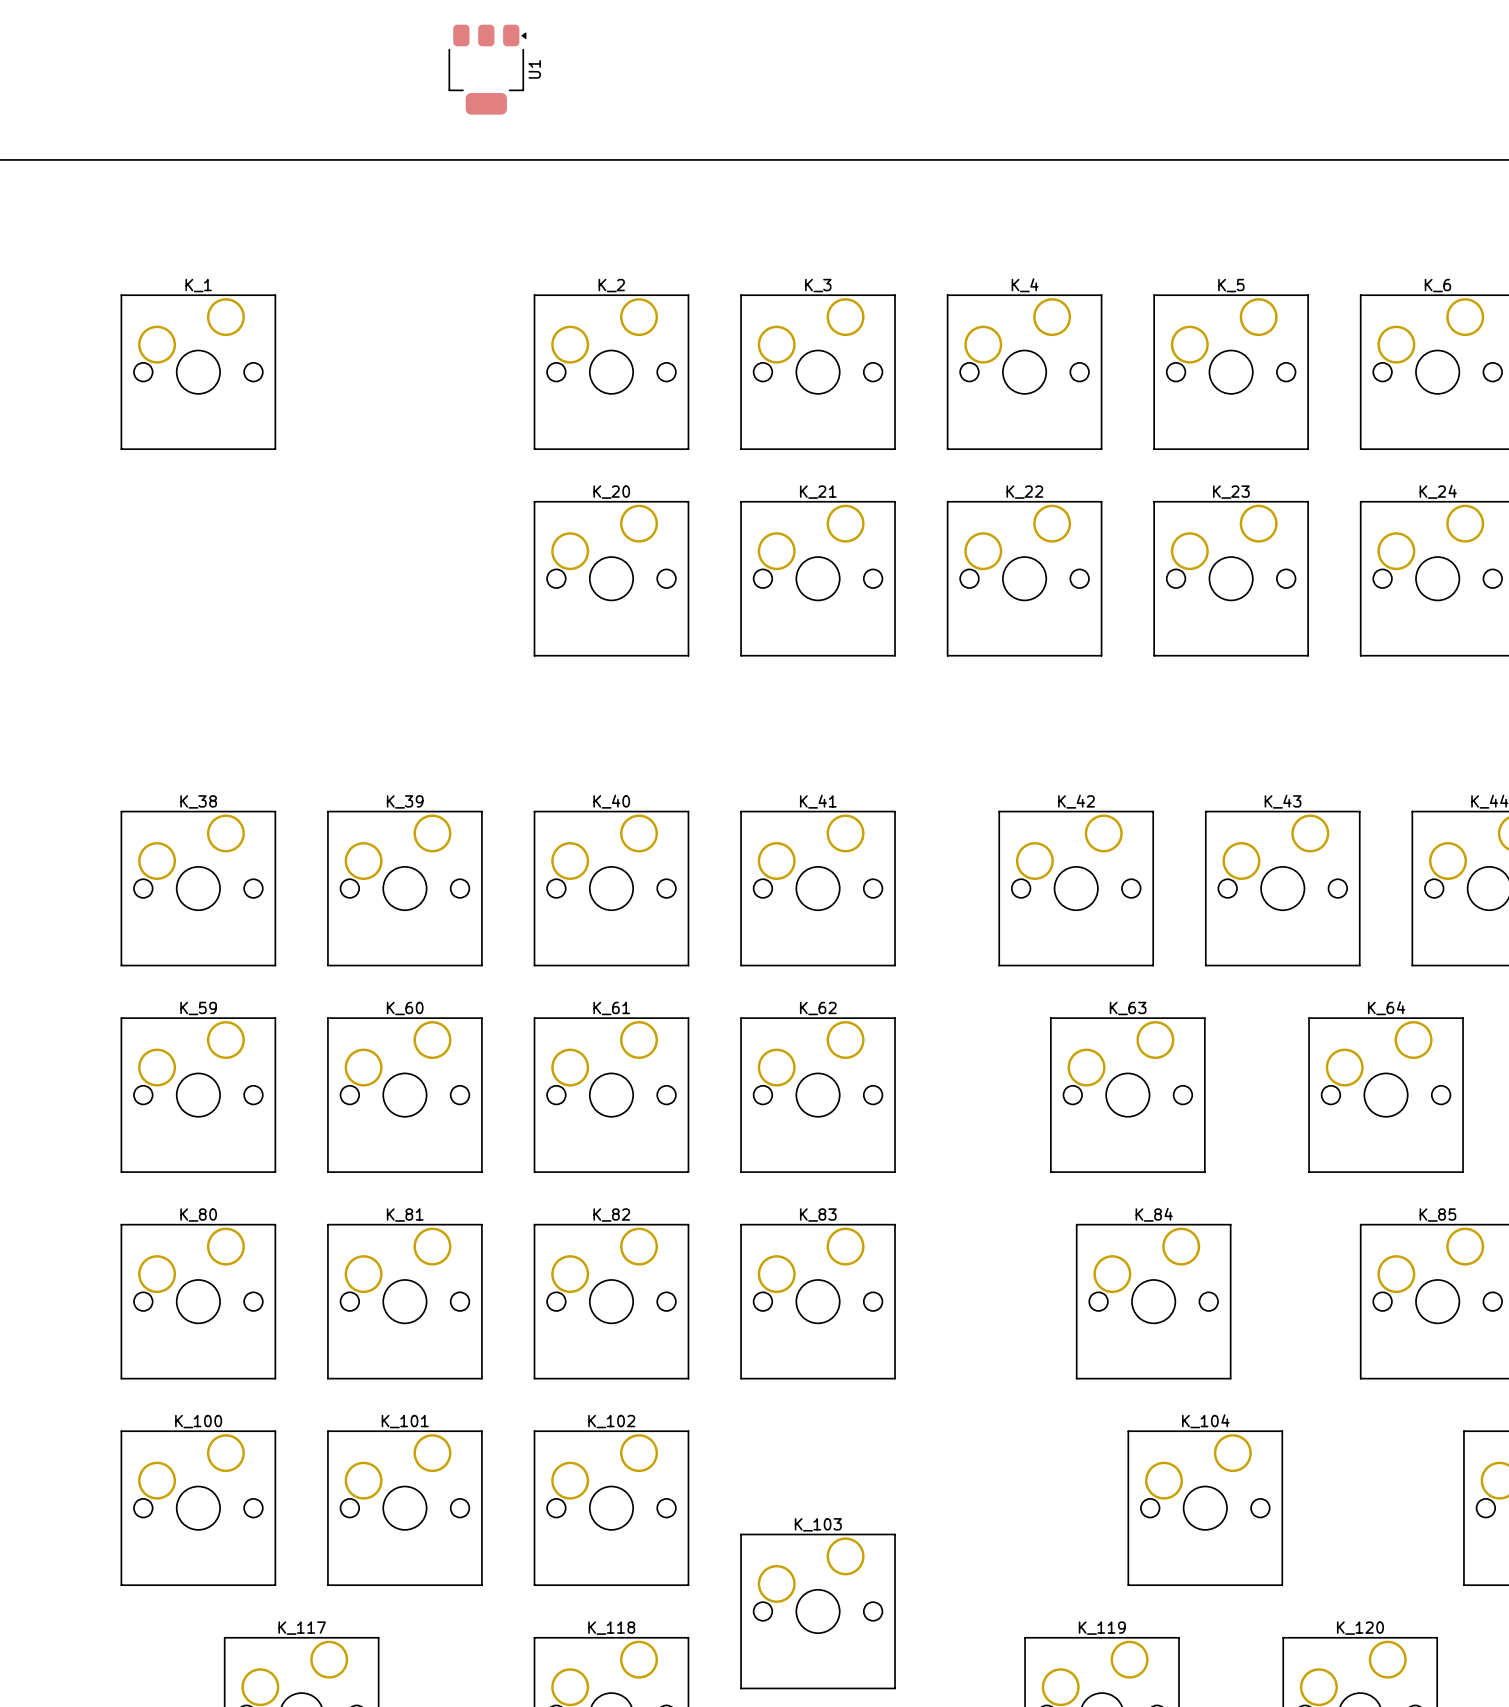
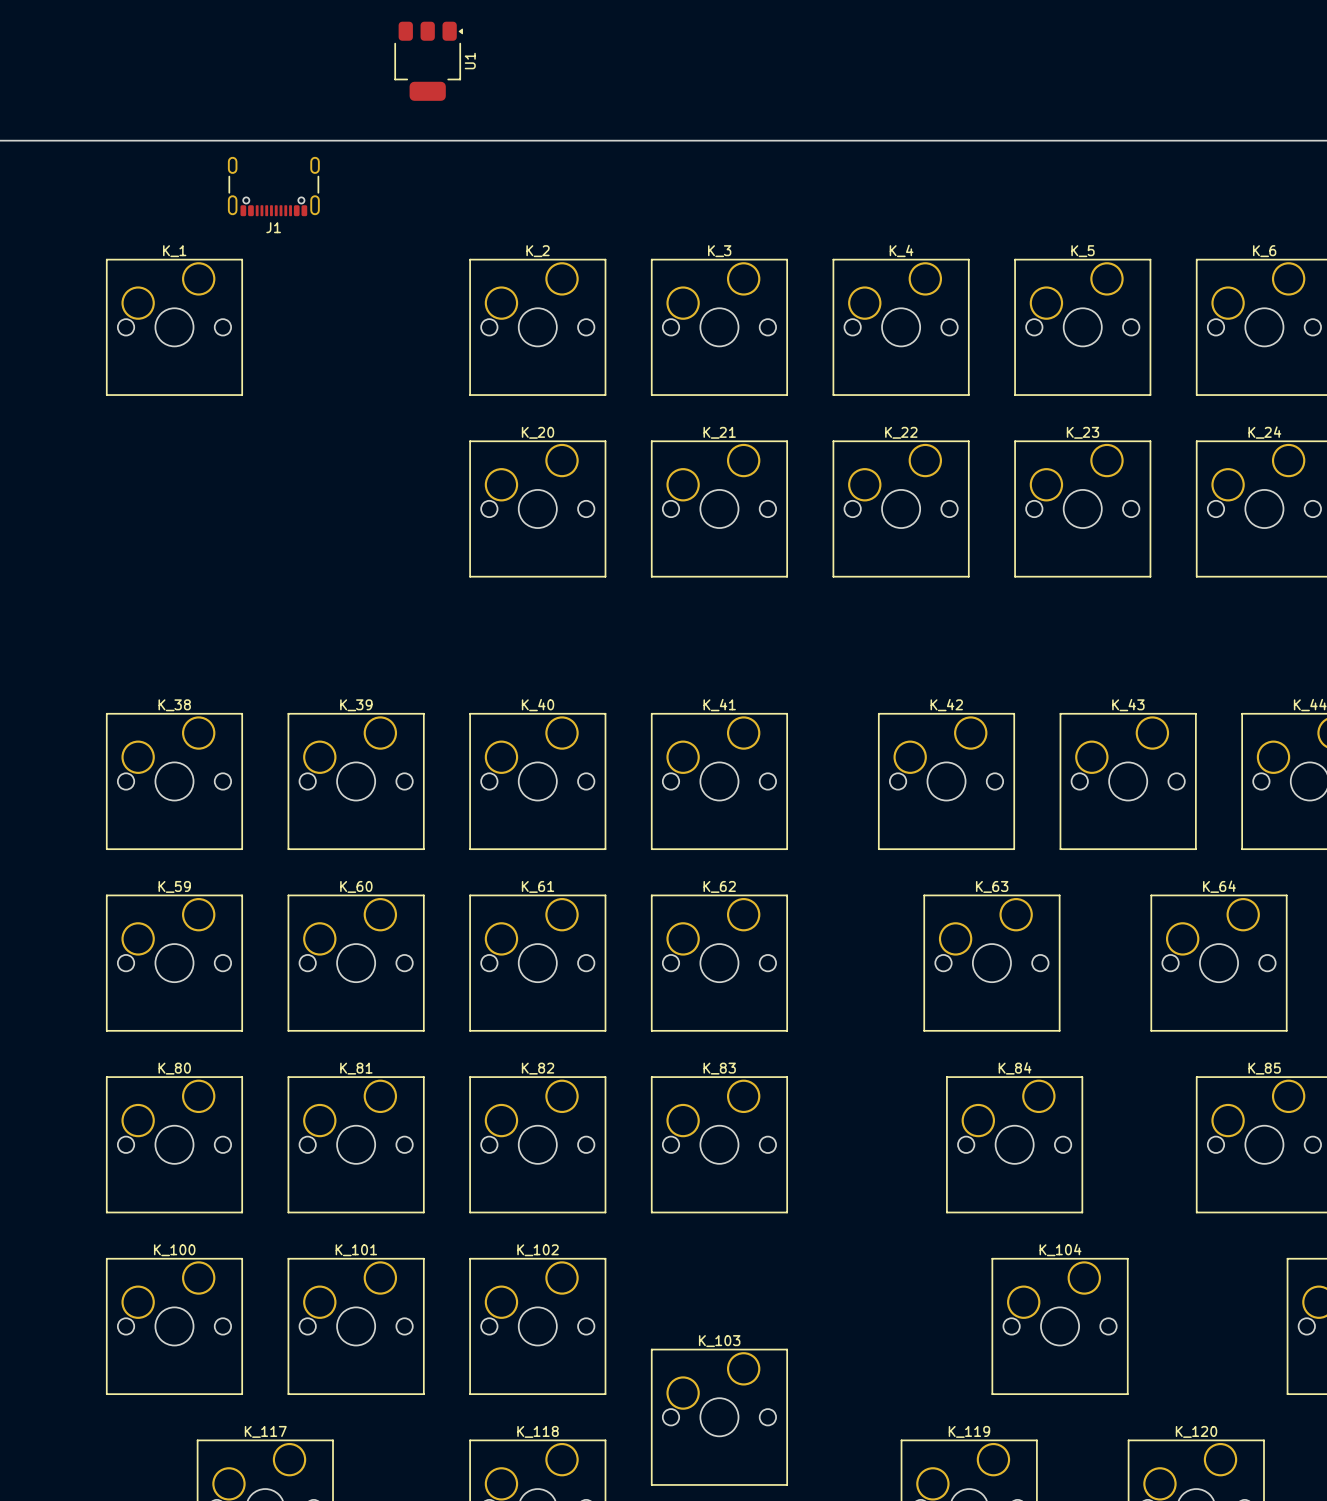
J1: none -> (273, 186)

